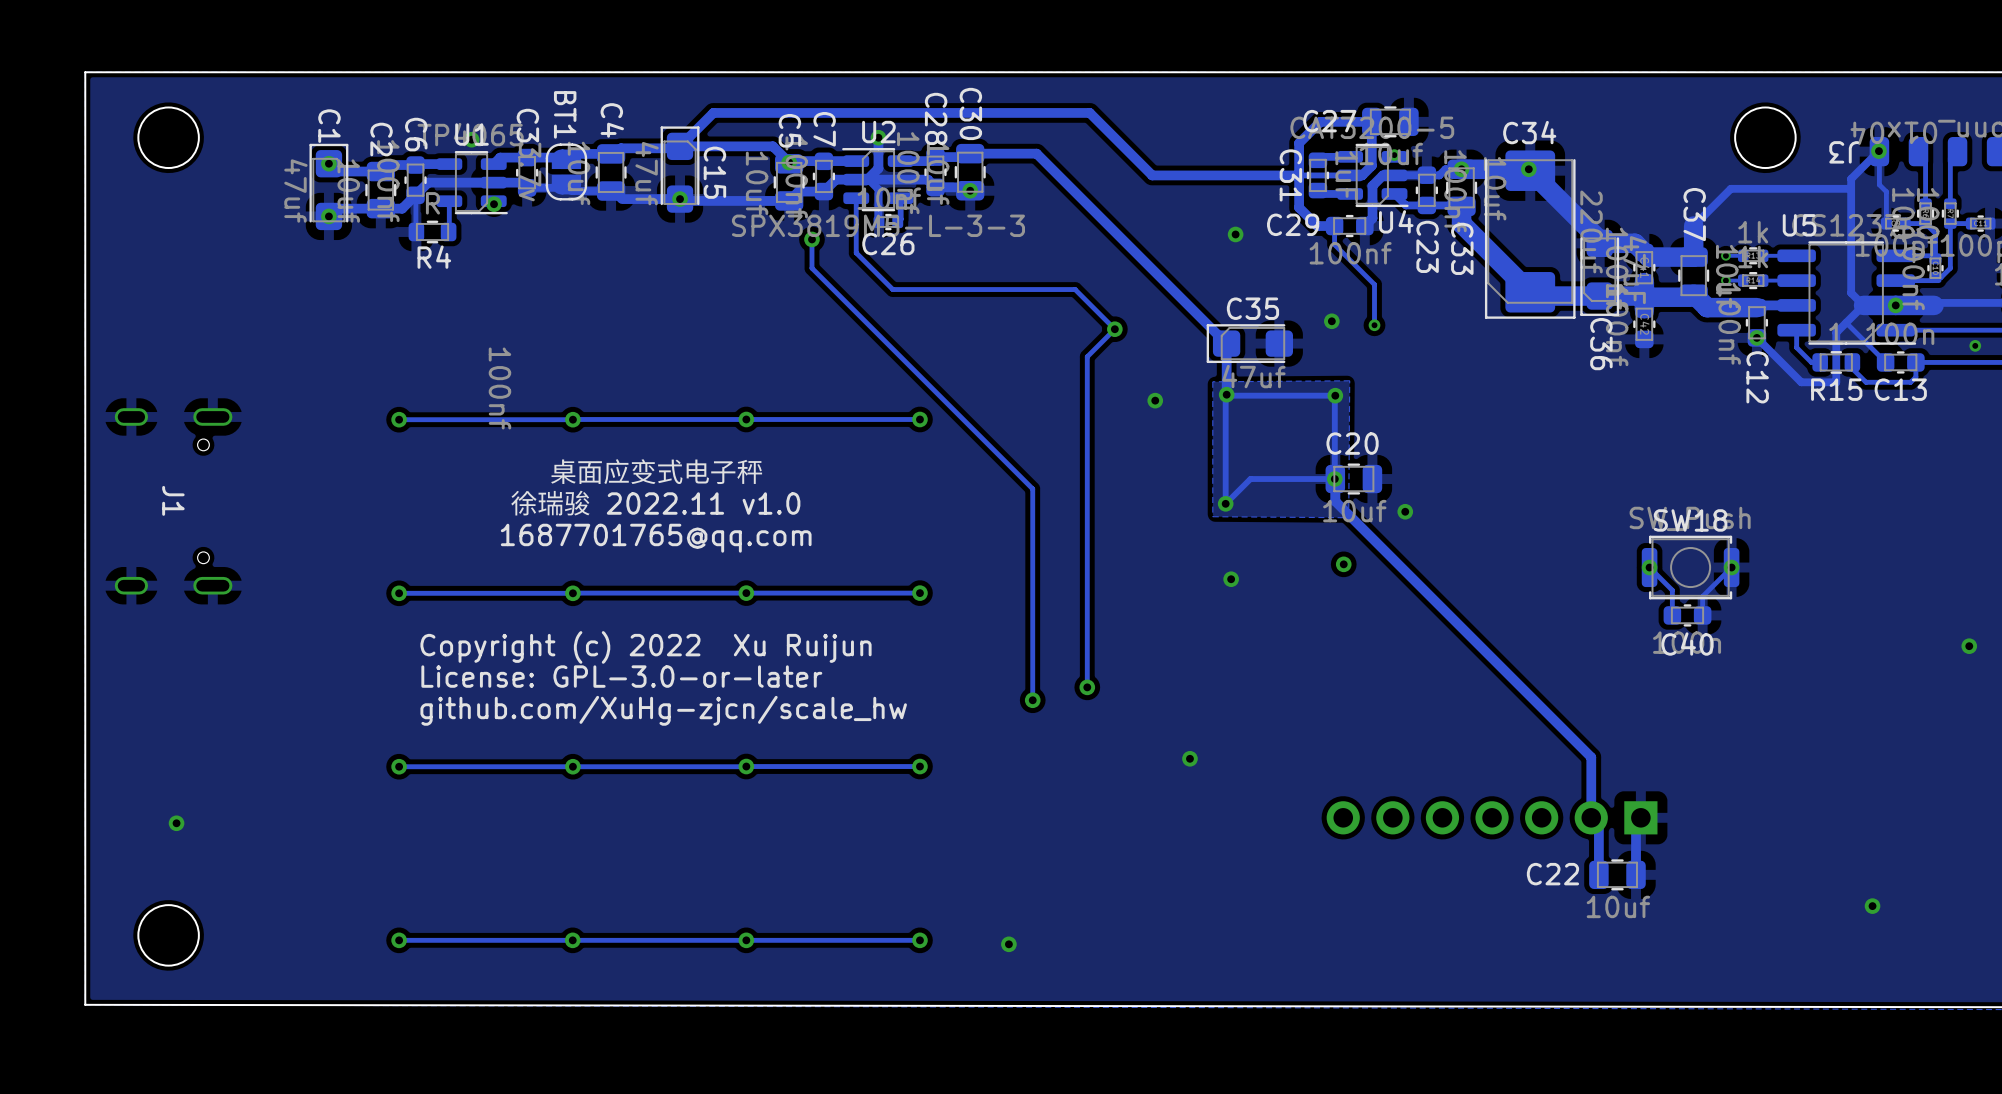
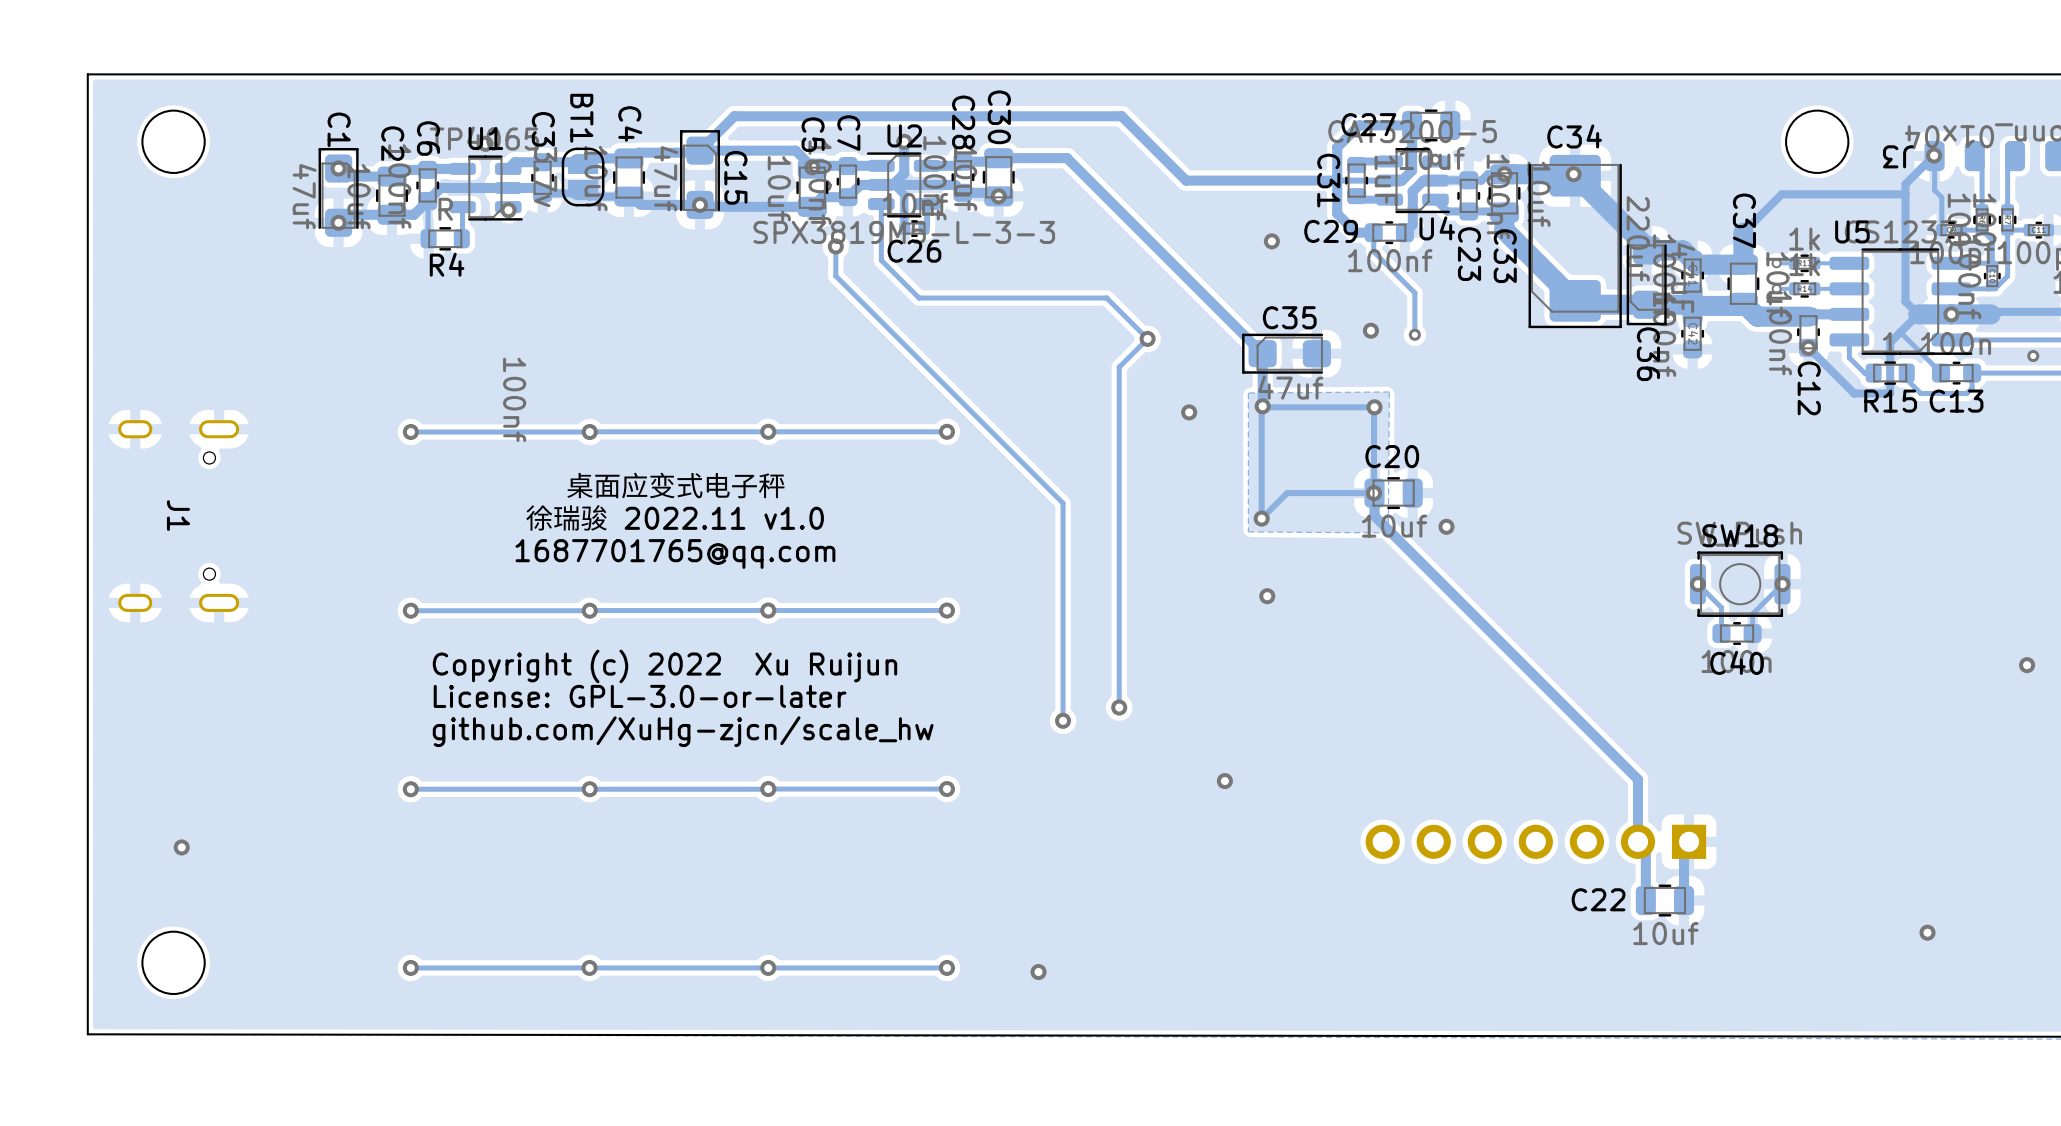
via: (1343, 564) -> none

